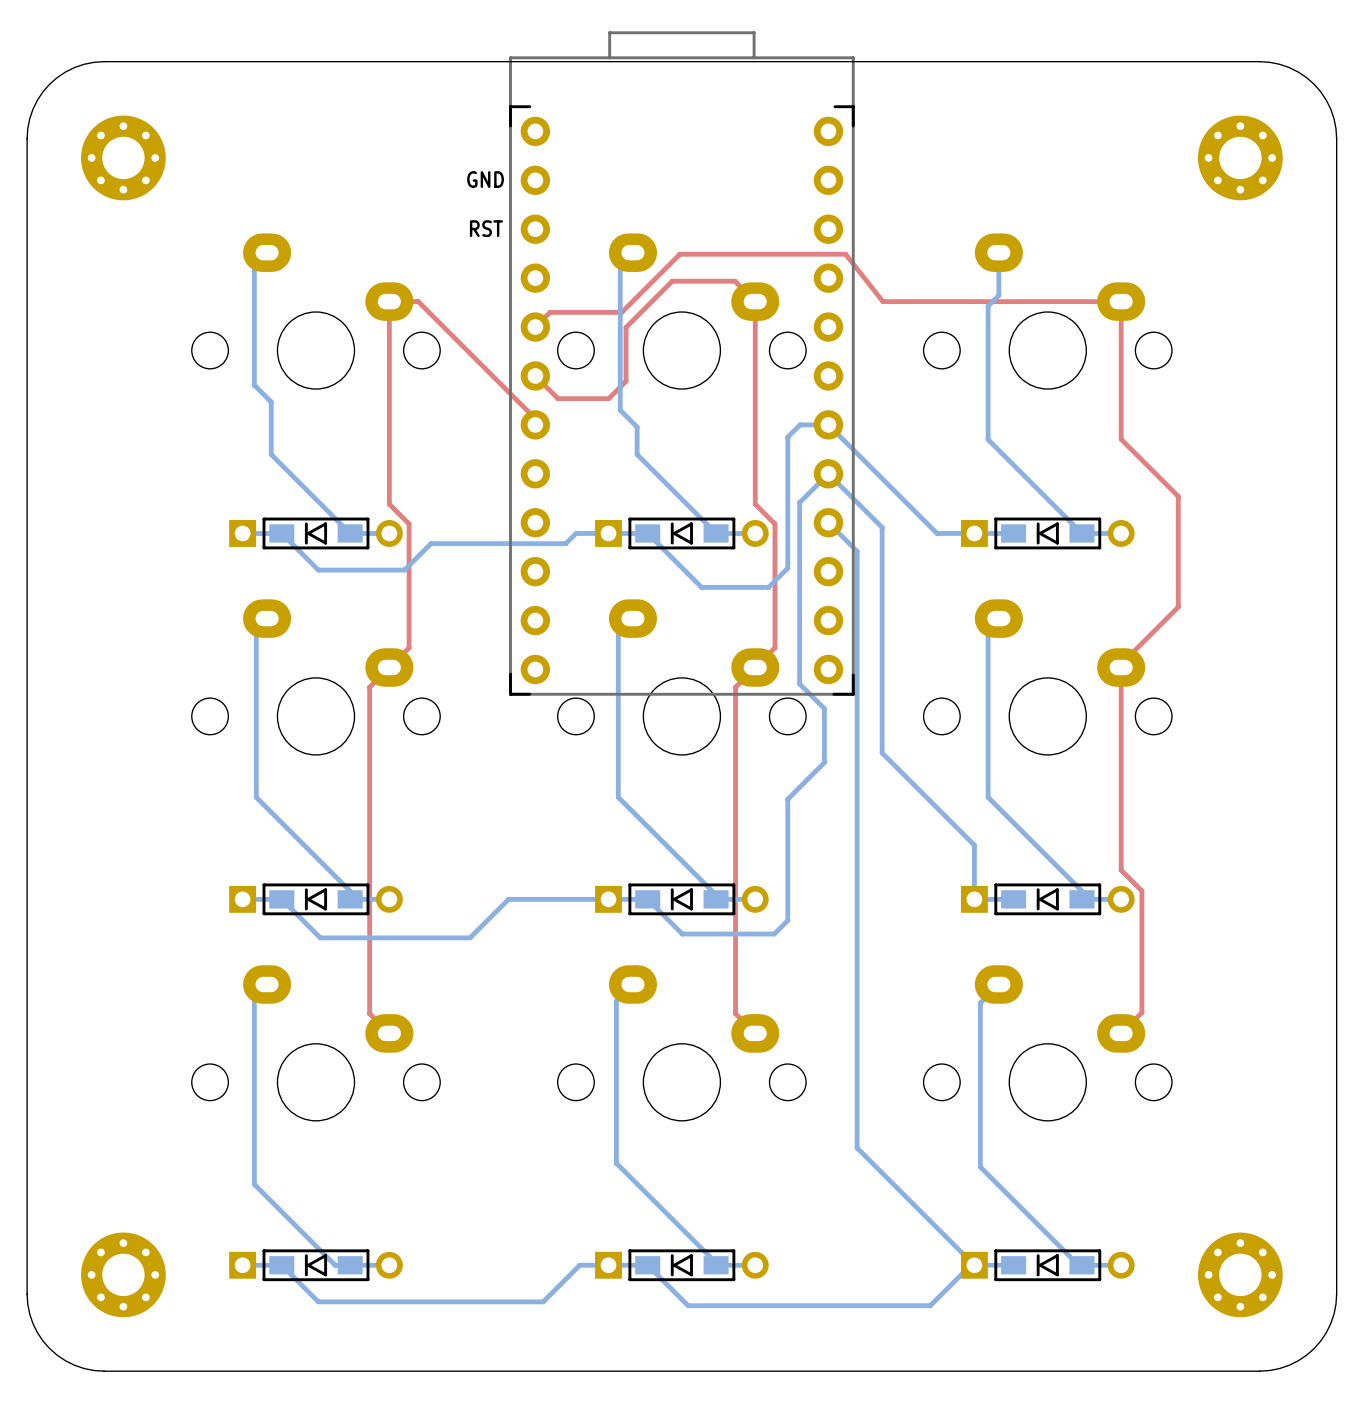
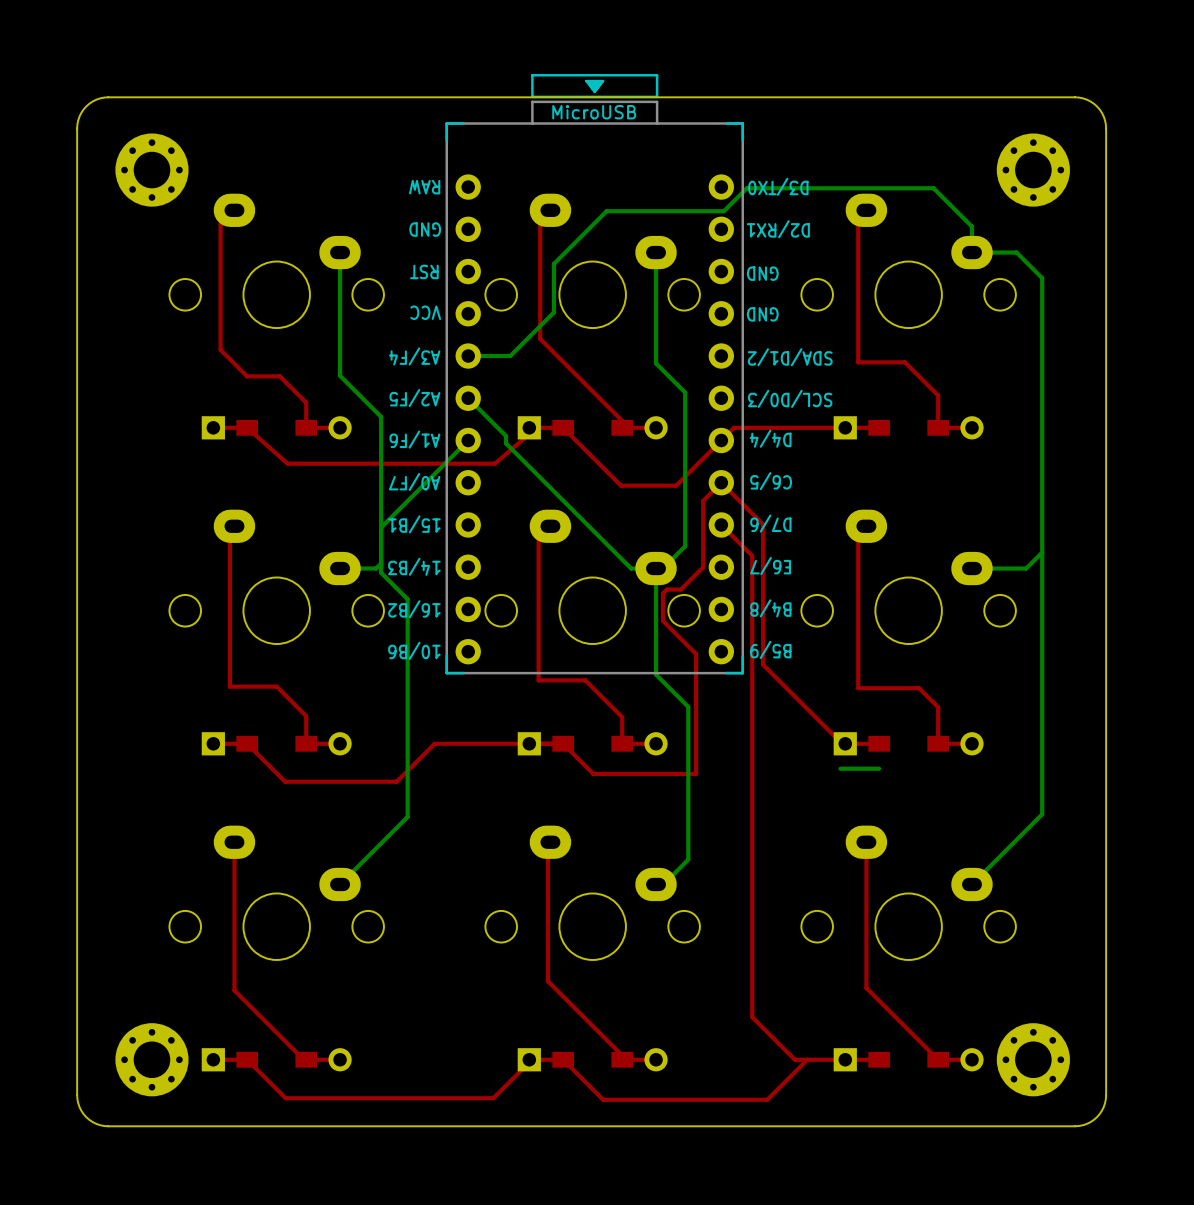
board edge: (1259, 61) (104, 61) (74, 67) (49, 84) (32, 109) (27, 138) (27, 1294) (32, 1323) (49, 1348) (74, 1365) (104, 1371) (1259, 1371) (1289, 1365) (1314, 1348) (1330, 1323) (1336, 1294) (1336, 138) (1330, 109) (1314, 84) (1289, 67) (1259, 61) -> (1074, 97) (1086, 99) (1096, 106) (1103, 116) (1106, 128) (1106, 1095) (1103, 1107) (1096, 1117) (1086, 1123) (1074, 1126) (108, 1126) (96, 1123) (86, 1117) (79, 1107) (77, 1095) (77, 128) (79, 116) (86, 106) (96, 99) (108, 97) (1074, 97)
part position: (123, 157) -> (151, 170)
part position: (1240, 157) -> (1033, 170)
bottom track: (267, 252) (254, 265) (254, 385) (271, 402) (271, 454) (350, 533) (389, 533) -> none
top track: none -> (234, 210) (220, 224) (220, 349) (247, 376) (279, 376) (306, 402) (306, 427) (340, 427)
bottom track: (632, 252) (620, 265) (620, 410) (637, 427) (637, 454) (716, 533) (755, 533) -> none
top track: none -> (550, 210) (540, 220) (540, 338) (622, 420) (622, 427) (656, 427)
bottom track: (998, 252) (998, 295) (988, 306) (988, 439) (1081, 533) (1121, 533) -> none
top track: none -> (866, 210) (858, 218) (858, 362) (905, 362) (938, 395) (938, 427) (972, 427)
bottom track: none -> (340, 252) (340, 375) (381, 416) (381, 572) (407, 599) (407, 816) (340, 884)
bottom track: none -> (656, 252) (656, 363) (685, 392) (685, 546) (662, 568) (631, 568) (506, 443) (506, 436) (468, 398)
top track: (535, 327) (550, 312) (621, 312) (679, 254) (845, 254) (882, 301) (1121, 301) (1121, 439) (1178, 496) (1178, 607) (1121, 664) (1121, 870) (1141, 890) (1141, 1012) (1121, 1033) -> none
part: (681, 363) -> none
top track: (535, 375) (558, 398) (608, 398) (626, 381) (626, 327) (672, 281) (734, 281) (755, 301) (755, 504) (774, 524) (774, 647) (735, 687) (735, 1013) (755, 1033) -> none
bottom track: none -> (468, 356) (510, 356) (554, 312) (554, 263) (606, 211) (723, 211) (746, 188) (933, 188) (972, 226) (972, 252) (1016, 252) (1042, 278) (1042, 814) (972, 884)
top track: (535, 424) (535, 418) (418, 301) (389, 301) (389, 504) (409, 524) (409, 647) (369, 687) (369, 1013) (389, 1033) -> none
part: none -> (594, 374)
top track: none -> (879, 427) (734, 427) (676, 485) (621, 485) (563, 427) (529, 427) (529, 434) (494, 463) (287, 463) (247, 427) (213, 427)
bottom track: none -> (468, 440) (381, 527)
bottom track: (828, 522) (857, 551) (857, 1147) (974, 1265) -> none
part side: bottom (315, 533) -> top (276, 427)
part side: bottom (681, 533) -> top (592, 427)
bottom track: (1013, 533) (937, 533) (828, 424) (800, 424) (787, 437) (787, 568) (768, 587) (701, 587) (647, 533) (575, 533) (565, 543) (430, 543) (404, 570) (318, 570) (281, 533) (242, 533) -> none
part side: bottom (1047, 533) -> top (908, 427)
top track: none -> (721, 524) (752, 555) (752, 1017) (794, 1059) (879, 1059)
bottom track: (267, 618) (256, 629) (256, 797) (350, 891) (350, 899) (389, 899) -> none
top track: none -> (234, 526) (229, 530) (229, 686) (276, 686) (306, 716) (306, 743) (340, 743)
bottom track: (632, 618) (618, 633) (618, 797) (716, 895) (716, 899) (755, 899) -> none
top track: none -> (550, 526) (538, 538) (538, 680) (585, 680) (622, 717) (622, 743) (656, 743)
bottom track: (998, 618) (988, 629) (988, 797) (1081, 891) (1081, 899) (1121, 899) -> none
top track: none -> (866, 526) (858, 534) (858, 688) (919, 688) (938, 707) (938, 743) (972, 743)
bottom track: none -> (1042, 552) (1026, 568) (972, 568)
bottom track: none -> (381, 563) (376, 568) (340, 568)
bottom track: none -> (656, 568) (656, 674) (688, 706) (688, 859) (663, 884) (656, 884)
top track: none -> (879, 743) (842, 743) (763, 664) (763, 524) (721, 482) (703, 500) (703, 567) (680, 589) (666, 589) (662, 593) (662, 620) (696, 654) (696, 773) (593, 773) (563, 743) (434, 743) (396, 781) (285, 781) (247, 743) (213, 743)
part side: bottom (315, 899) -> top (276, 743)
part side: bottom (681, 899) -> top (592, 743)
bottom track: (974, 899) (974, 845) (882, 753) (882, 527) (828, 473) (799, 502) (799, 683) (824, 708) (824, 762) (787, 799) (787, 920) (774, 934) (682, 934) (647, 899) (508, 899) (470, 937) (320, 937) (281, 899) (242, 899) -> none
part side: bottom (1047, 899) -> top (908, 743)
bottom track: (267, 984) (254, 997) (254, 1184) (335, 1265) (389, 1265) -> none
top track: none -> (234, 842) (234, 990) (303, 1059) (340, 1059)
bottom track: (632, 984) (616, 1001) (616, 1163) (716, 1262) (716, 1265) (755, 1265) -> none
bottom track: (998, 984) (980, 1002) (980, 1167) (1078, 1265) (1121, 1265) -> none
top track: none -> (866, 842) (866, 988) (938, 1059) (972, 1059)
top track: none -> (547, 844) (547, 981) (622, 1055) (622, 1059) (656, 1059)
top track: none -> (807, 1059) (767, 1099) (603, 1099) (563, 1059) (531, 1059) (529, 1057) (529, 1062) (493, 1098) (285, 1098) (247, 1059) (213, 1059)
part side: bottom (315, 1265) -> top (276, 1059)
part side: bottom (681, 1265) -> top (592, 1059)
bottom track: (1013, 1265) (970, 1265) (930, 1305) (688, 1305) (647, 1265) (579, 1265) (543, 1301) (318, 1301) (281, 1265) (242, 1265) -> none
part side: bottom (1047, 1265) -> top (908, 1059)
part position: (123, 1274) -> (151, 1059)
part position: (1240, 1274) -> (1033, 1059)

